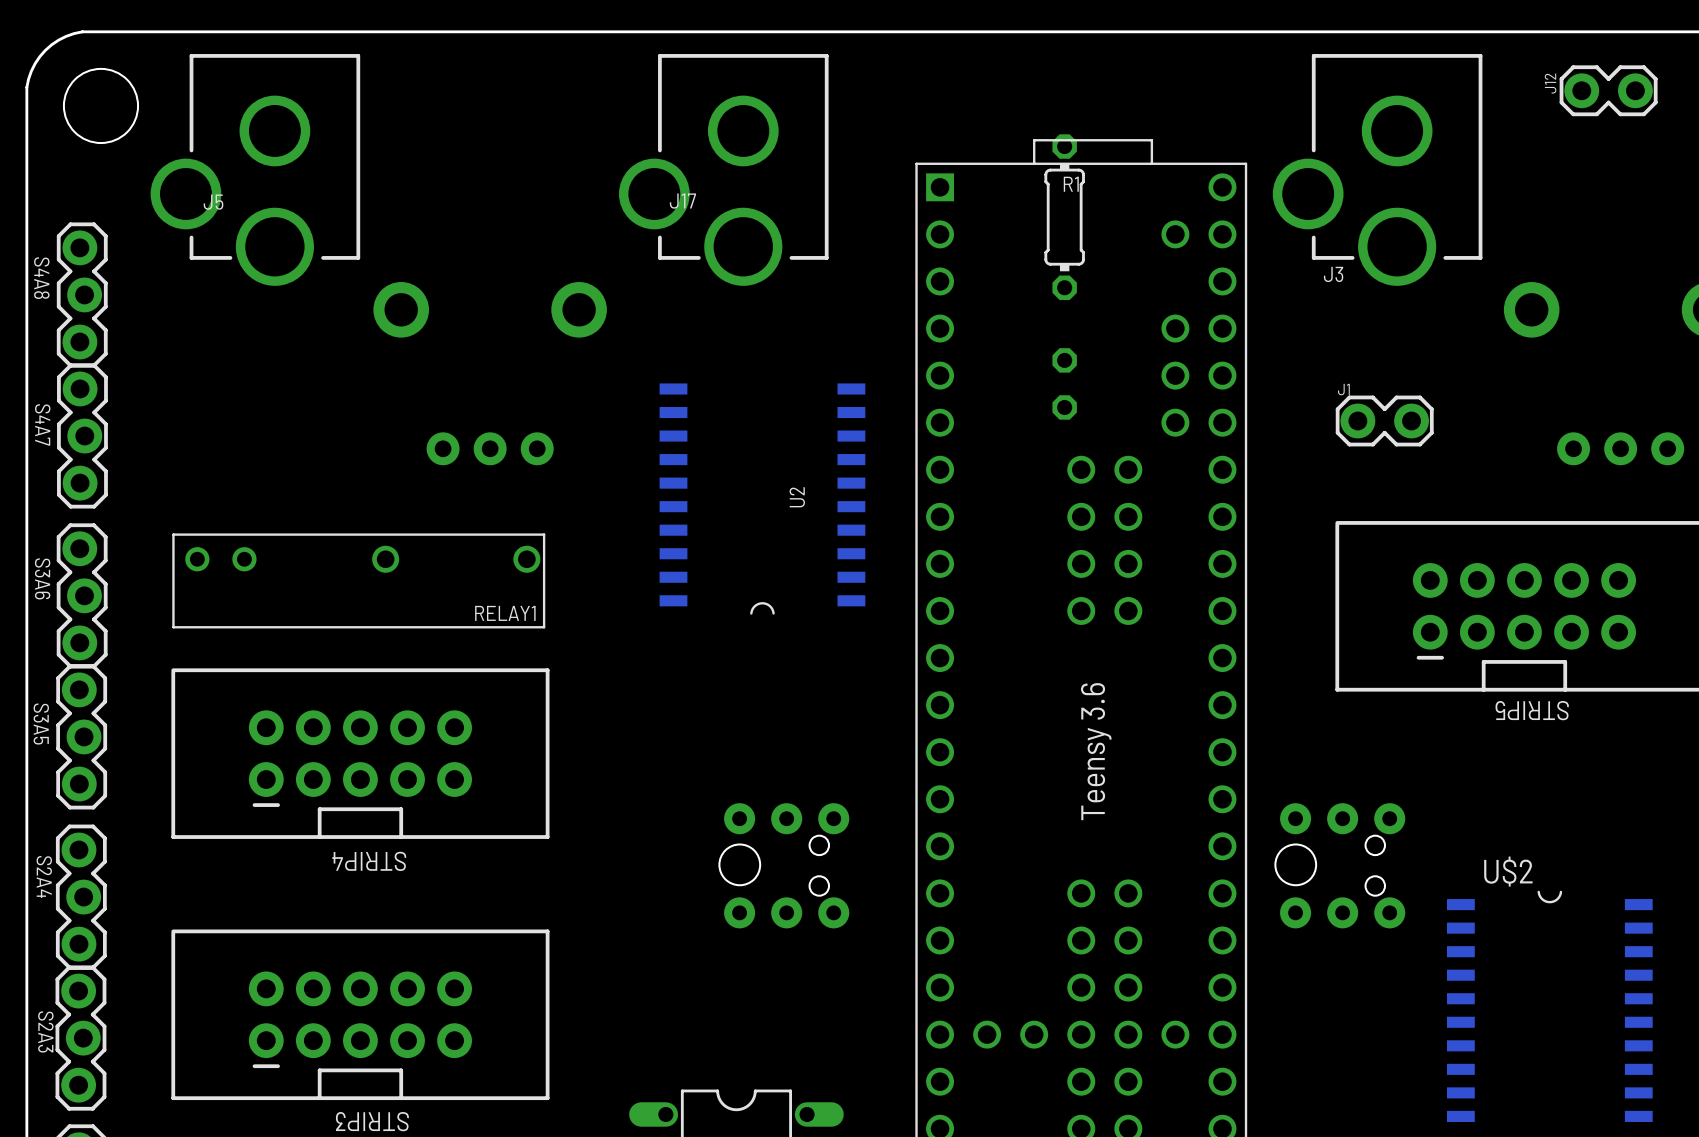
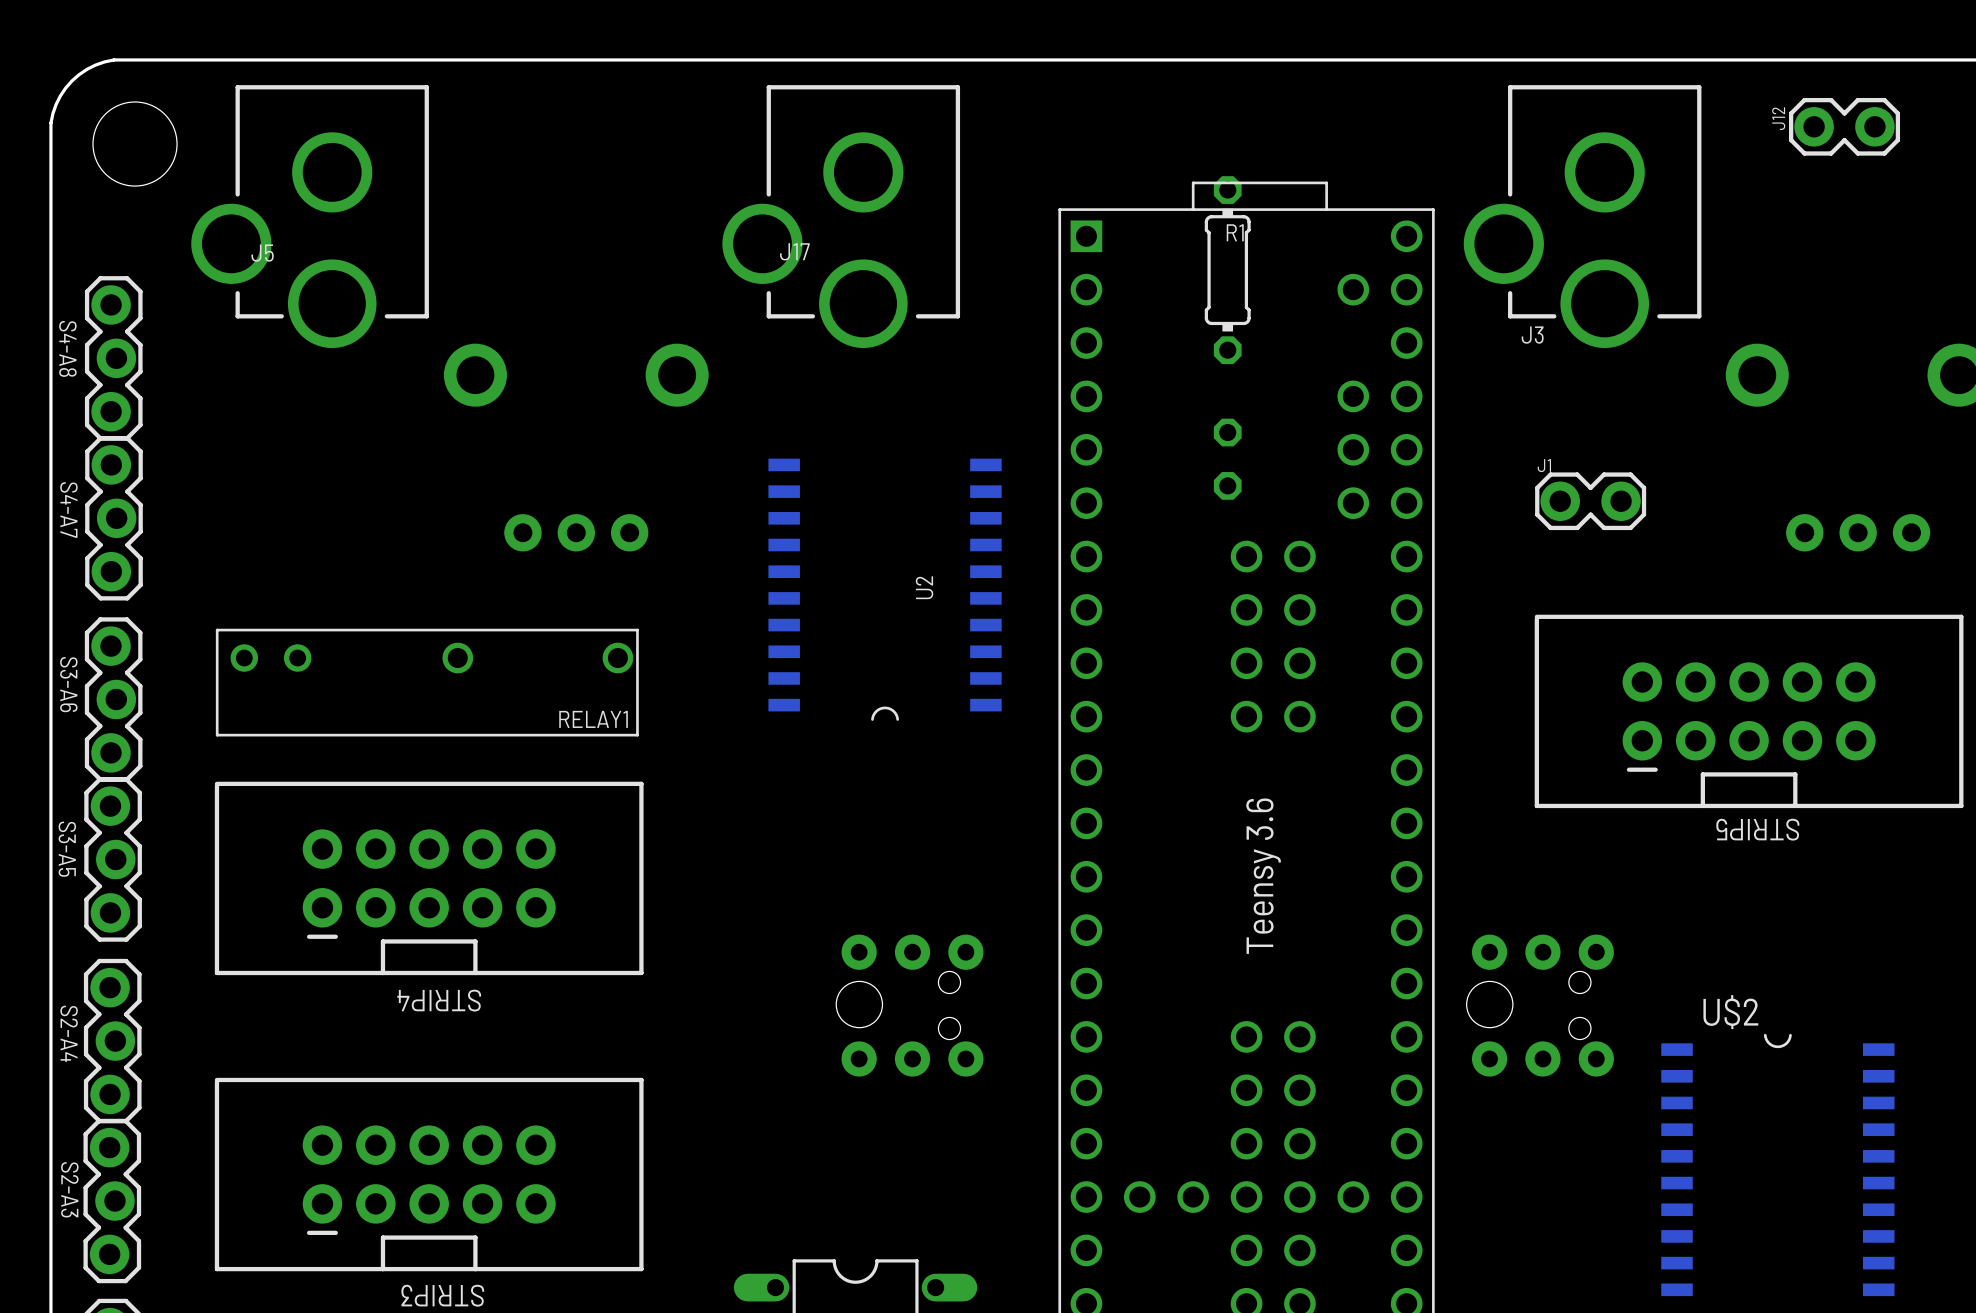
S4A8 name: S4A8 (41, 278) -> S4-A8 (67, 348)
S4A7 name: S4A7 (42, 424) -> S4-A7 (68, 510)
S3A6 name: S3A6 (42, 578) -> S3-A6 (68, 684)
S3A5 name: S3A5 (41, 724) -> S3-A5 (67, 849)
S2A4 name: S2A4 (44, 876) -> S2-A4 (69, 1033)
S2A3 name: S2A3 (45, 1031) -> S2-A3 (69, 1189)

